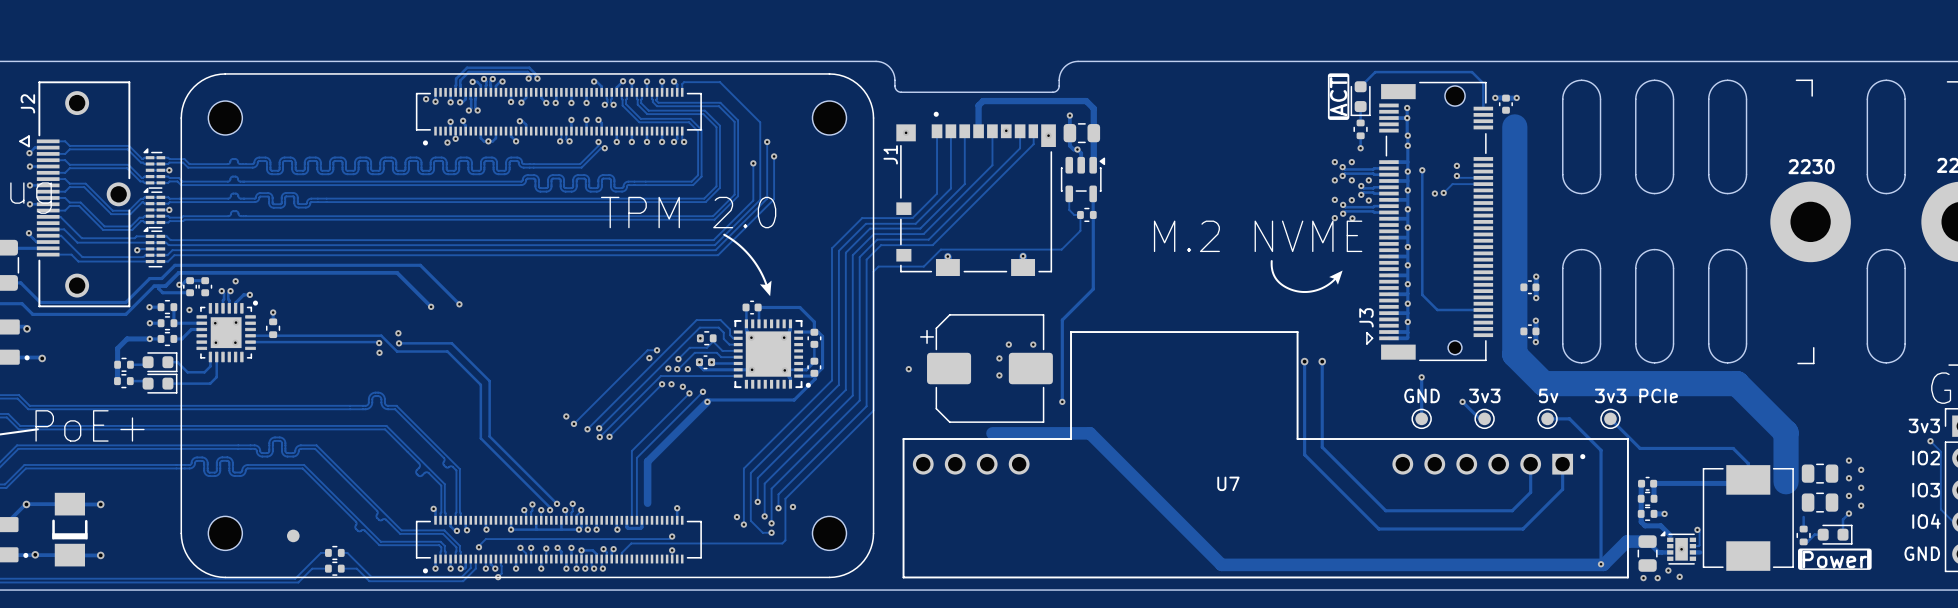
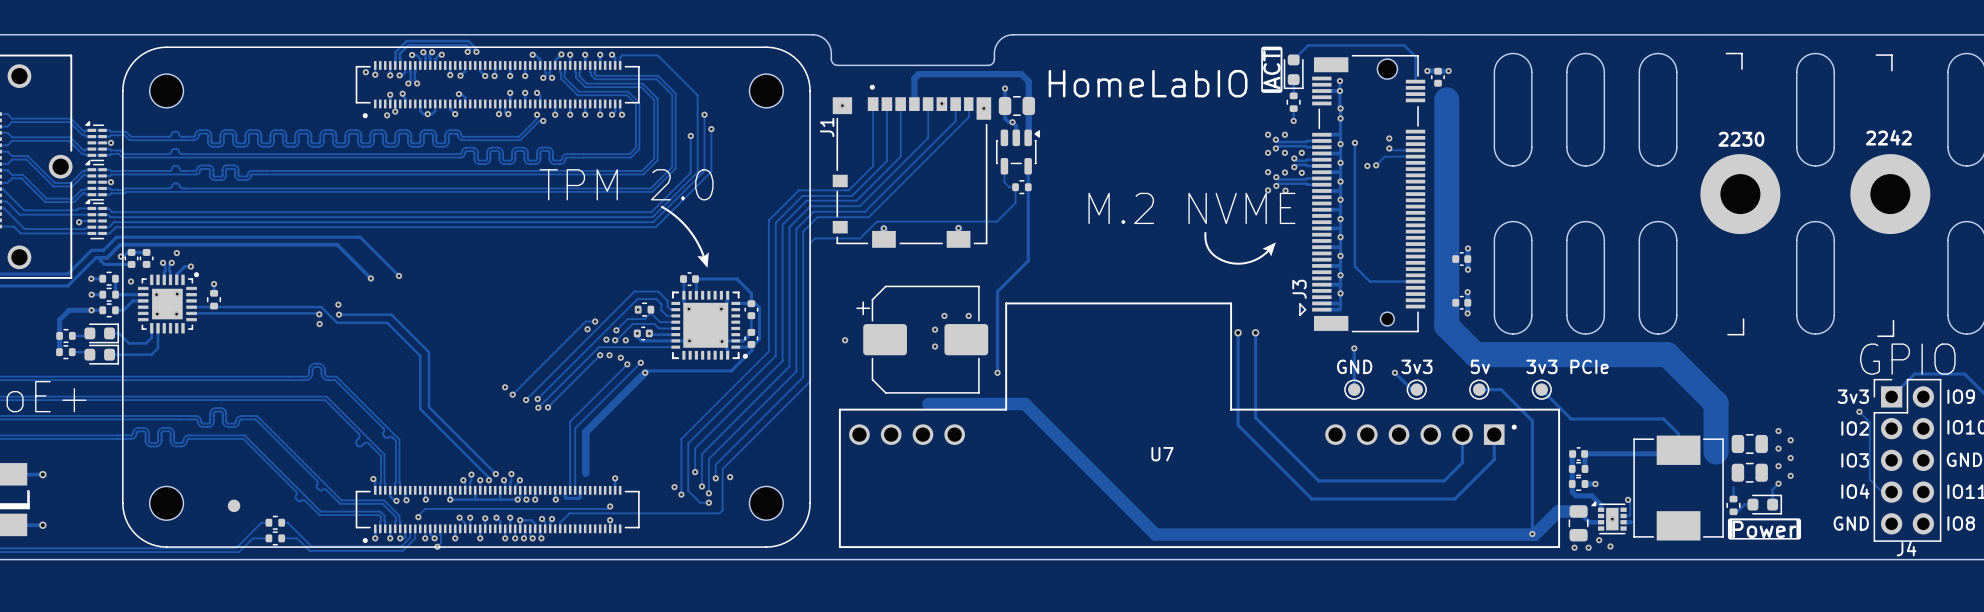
text: none -> HomeLabIO (1148, 83)

